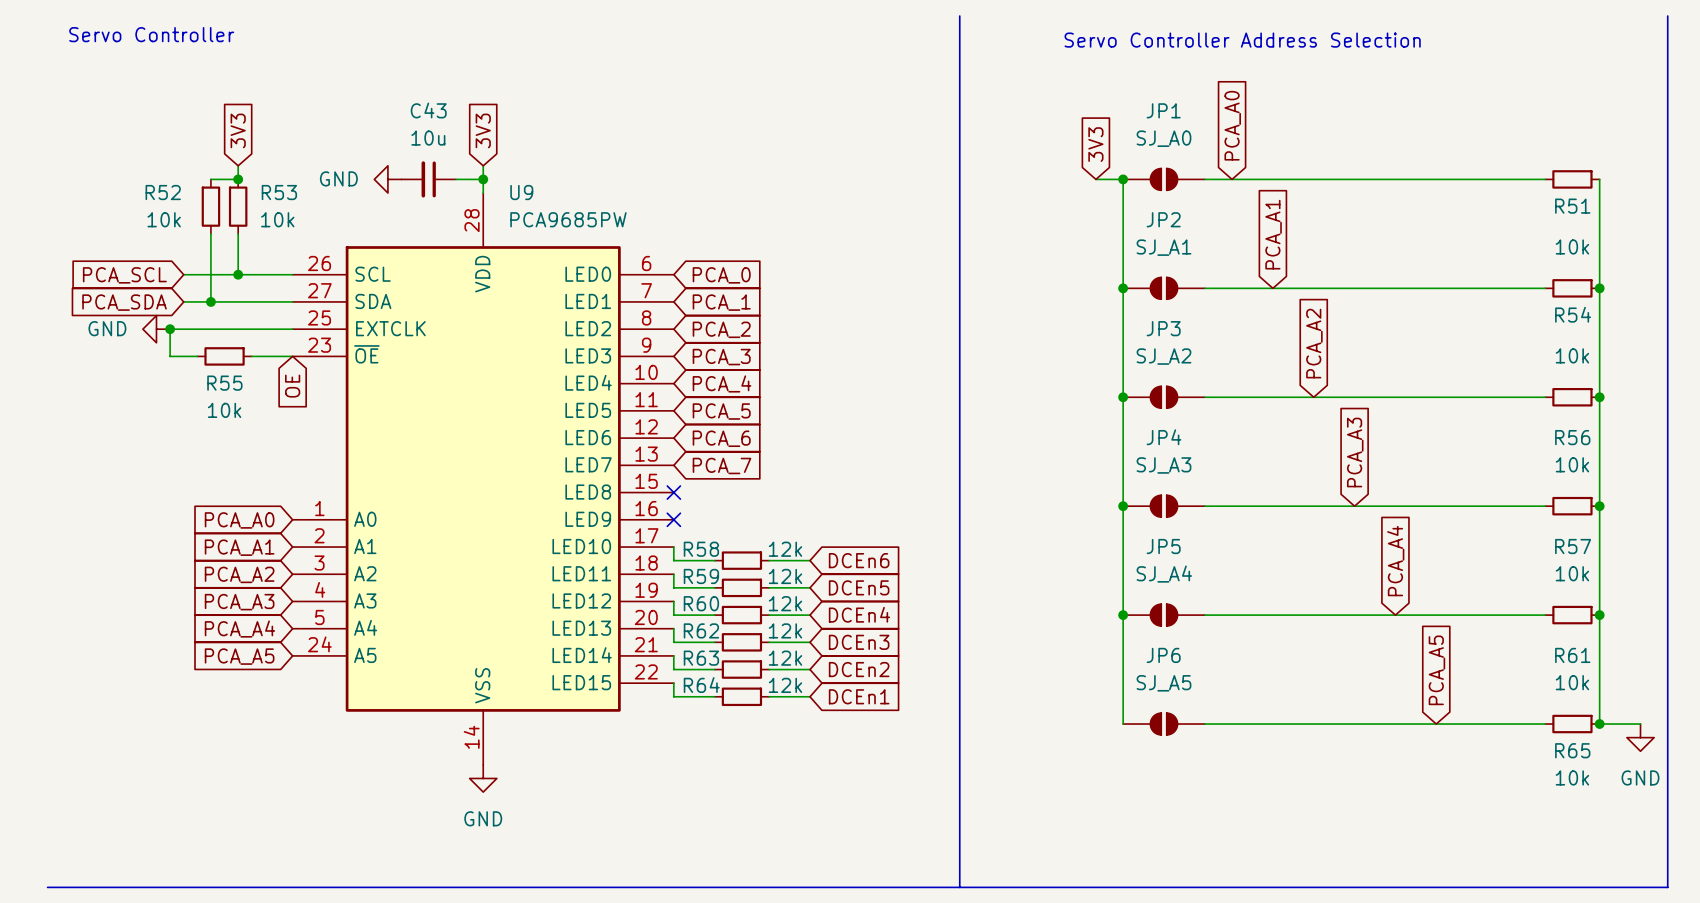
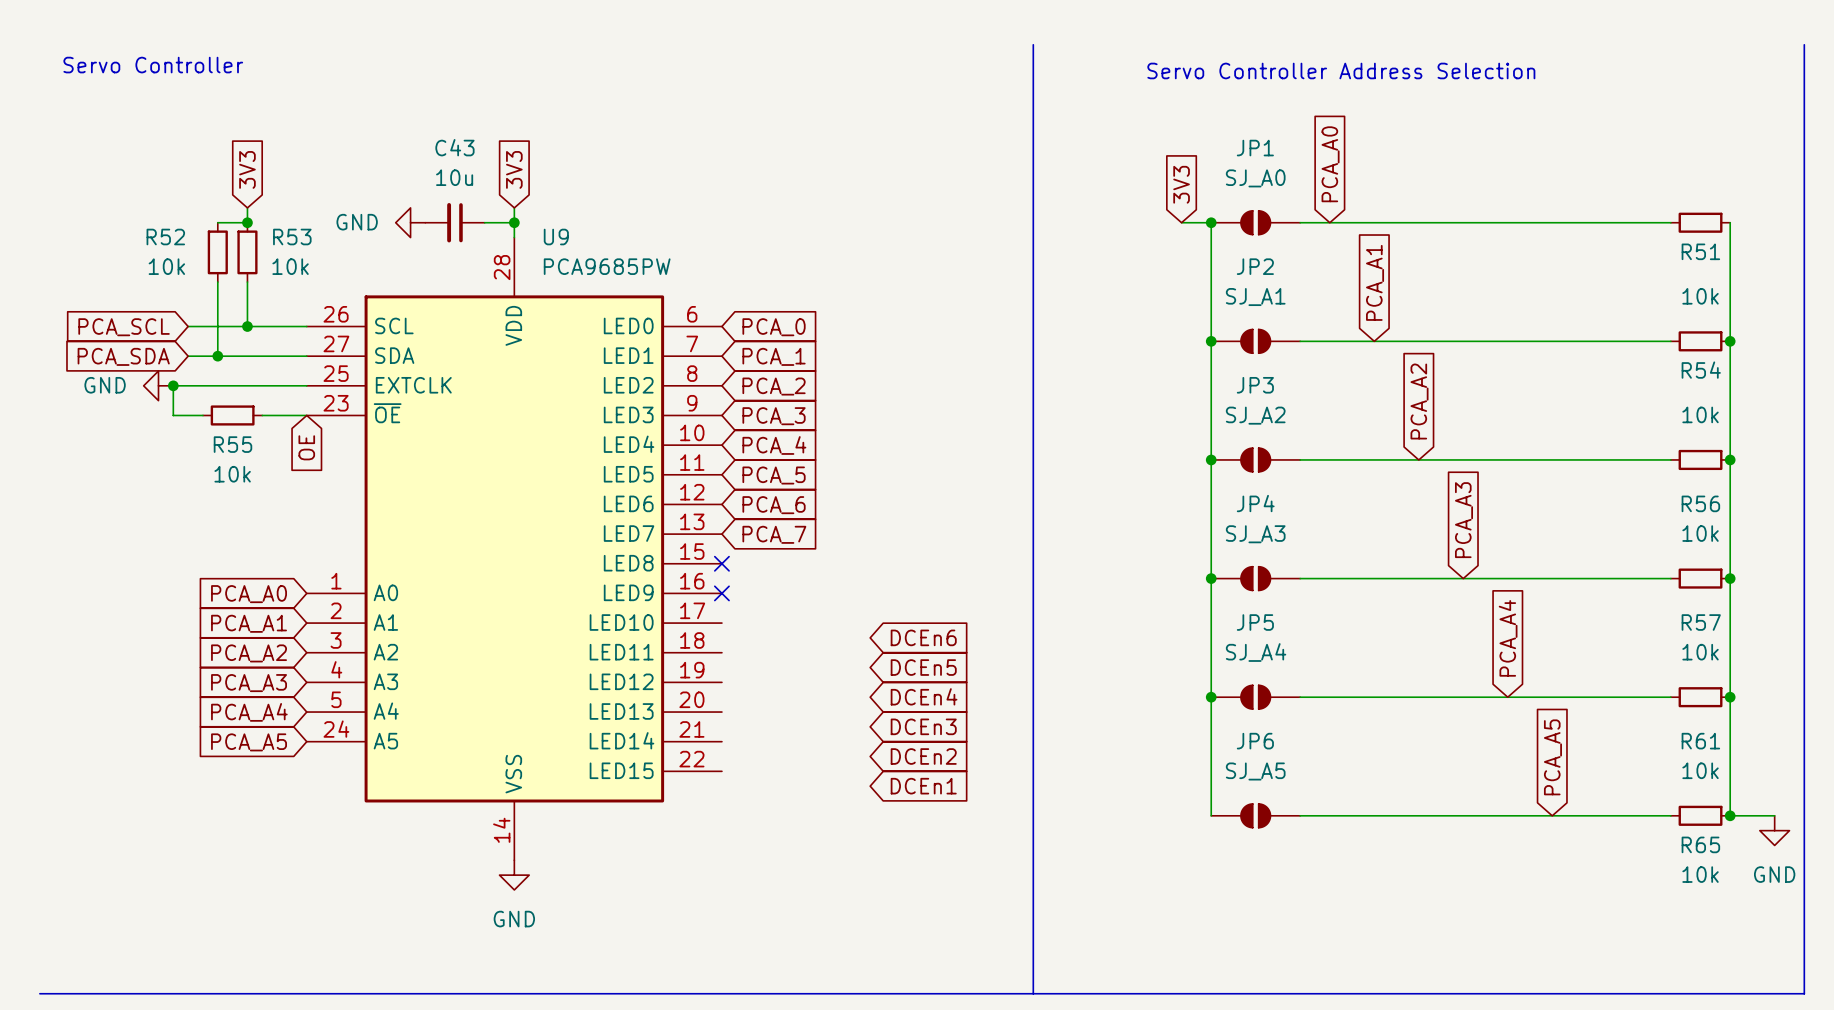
wire: (673, 547) (673, 560) (714, 560) -> none
R58: 12k (741, 560) -> none
wire: (769, 560) (810, 560) -> none
wire: (673, 574) (673, 587) (714, 587) -> none
R59: 12k (741, 587) -> none
wire: (769, 587) (810, 587) -> none
wire: (673, 601) (673, 615) (714, 615) -> none
R60: 12k (741, 615) -> none
wire: (769, 615) (810, 615) -> none
wire: (673, 628) (673, 642) (714, 642) -> none
R62: 12k (741, 642) -> none
wire: (769, 642) (810, 642) -> none
wire: (673, 655) (673, 669) (714, 669) -> none
R63: 12k (741, 669) -> none
wire: (769, 669) (810, 669) -> none
wire: (673, 683) (673, 696) (714, 696) -> none
R64: 12k (741, 696) -> none
wire: (769, 696) (810, 696) -> none

